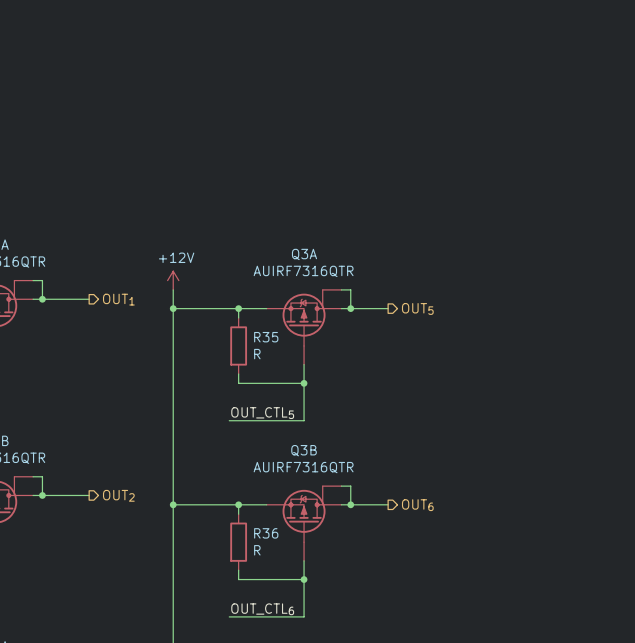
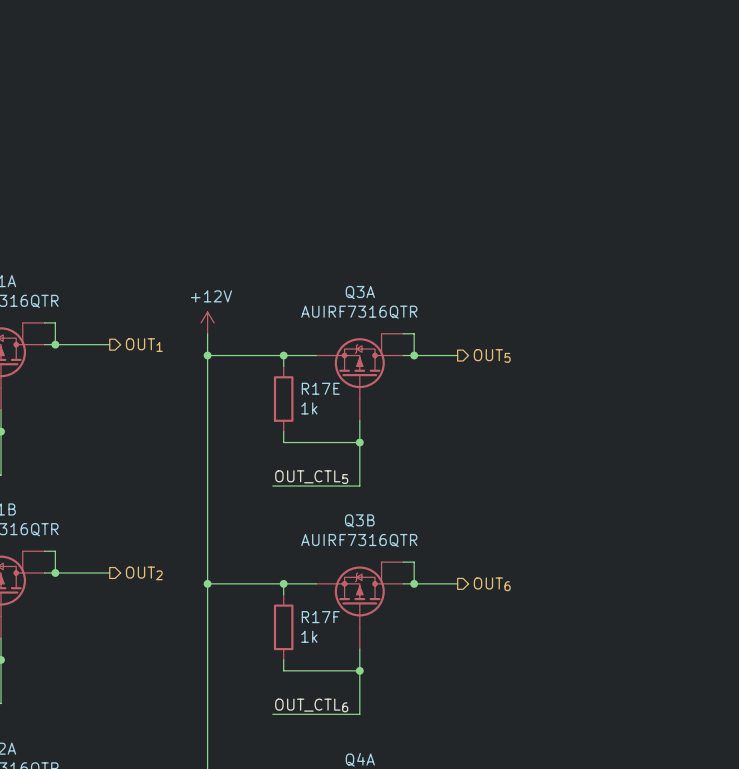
R35 name: R35 (266, 337) -> R17E (320, 388)
R35 value: R (257, 354) -> none
R35 text: none -> 1k (309, 408)
R36 name: R36 (266, 533) -> R17F (320, 617)
R36 value: R (257, 550) -> none
R36 text: none -> 1k (309, 636)

